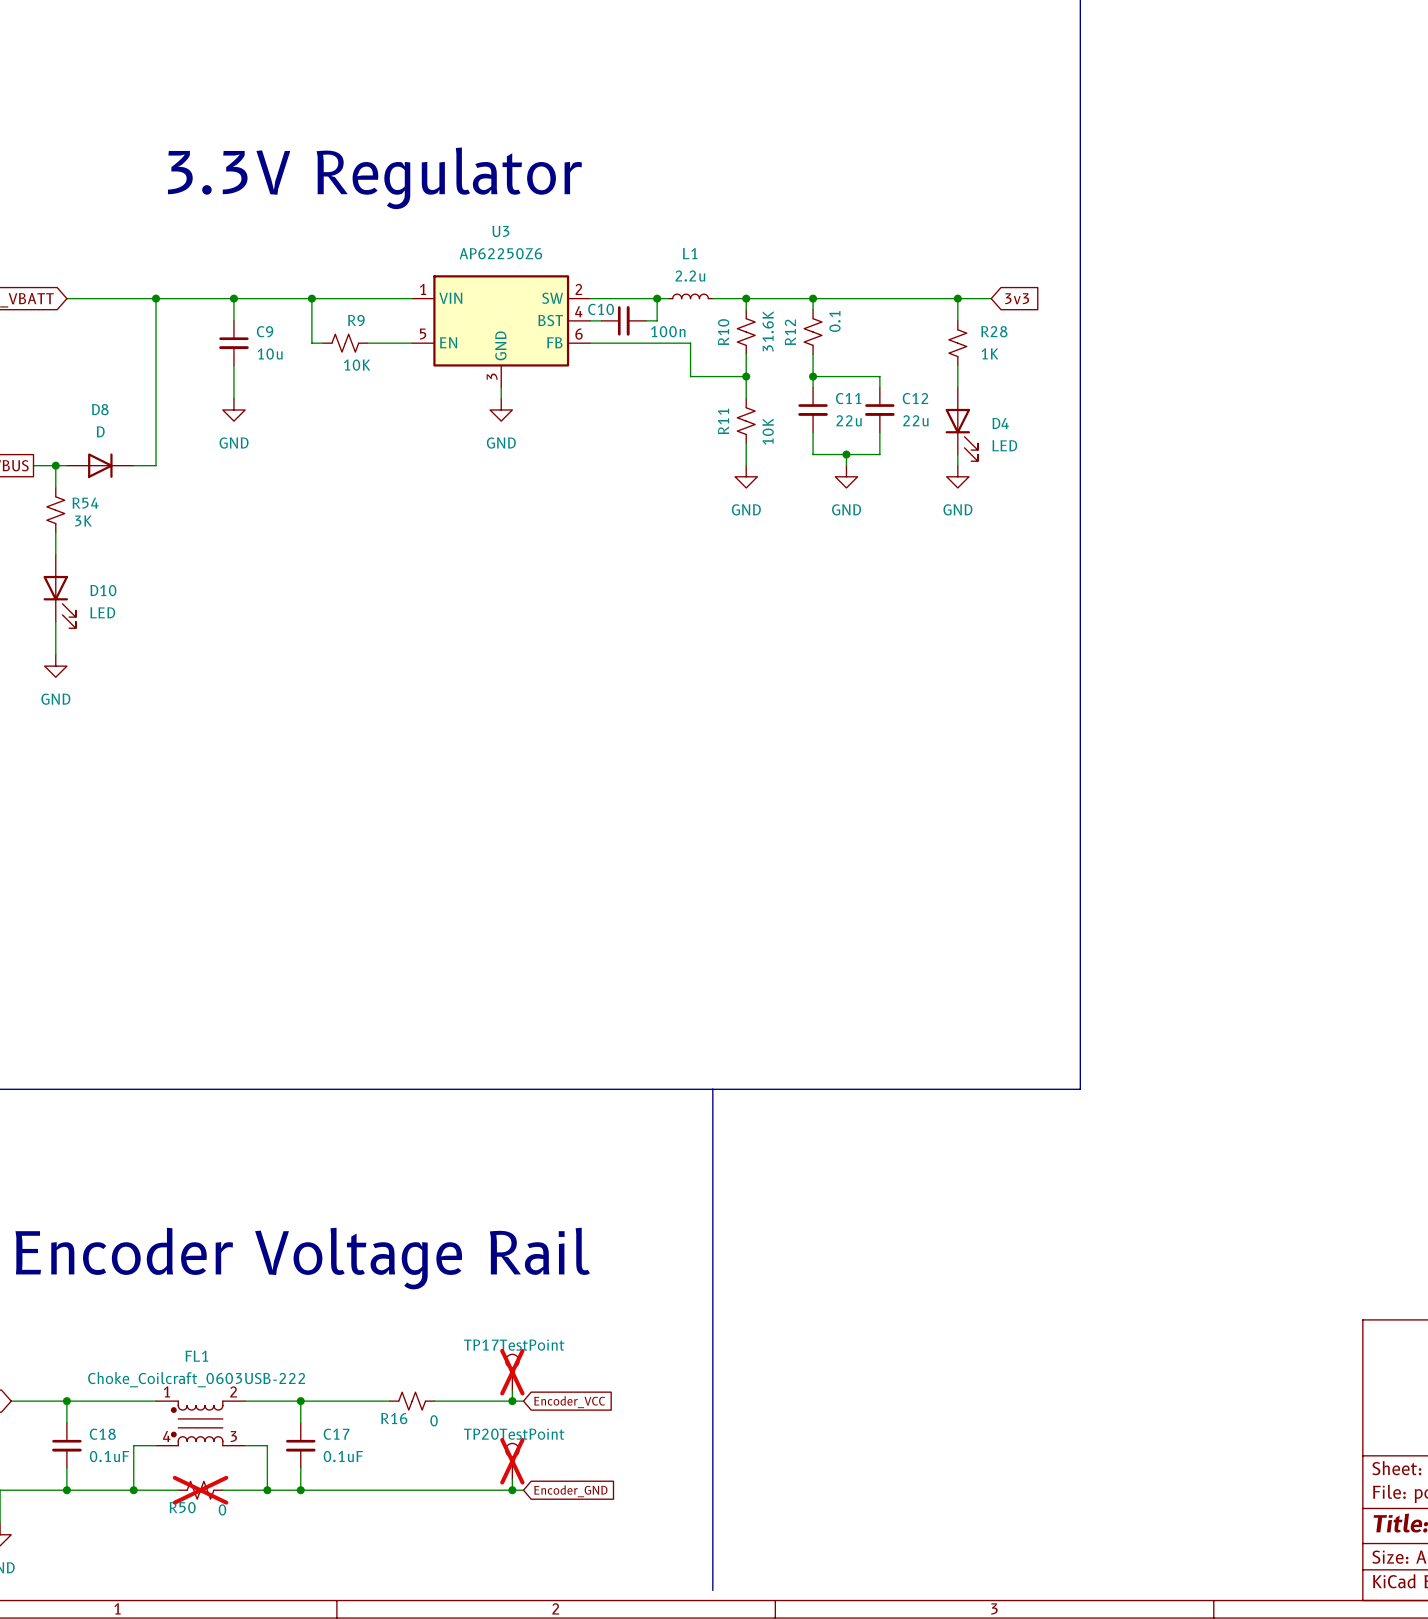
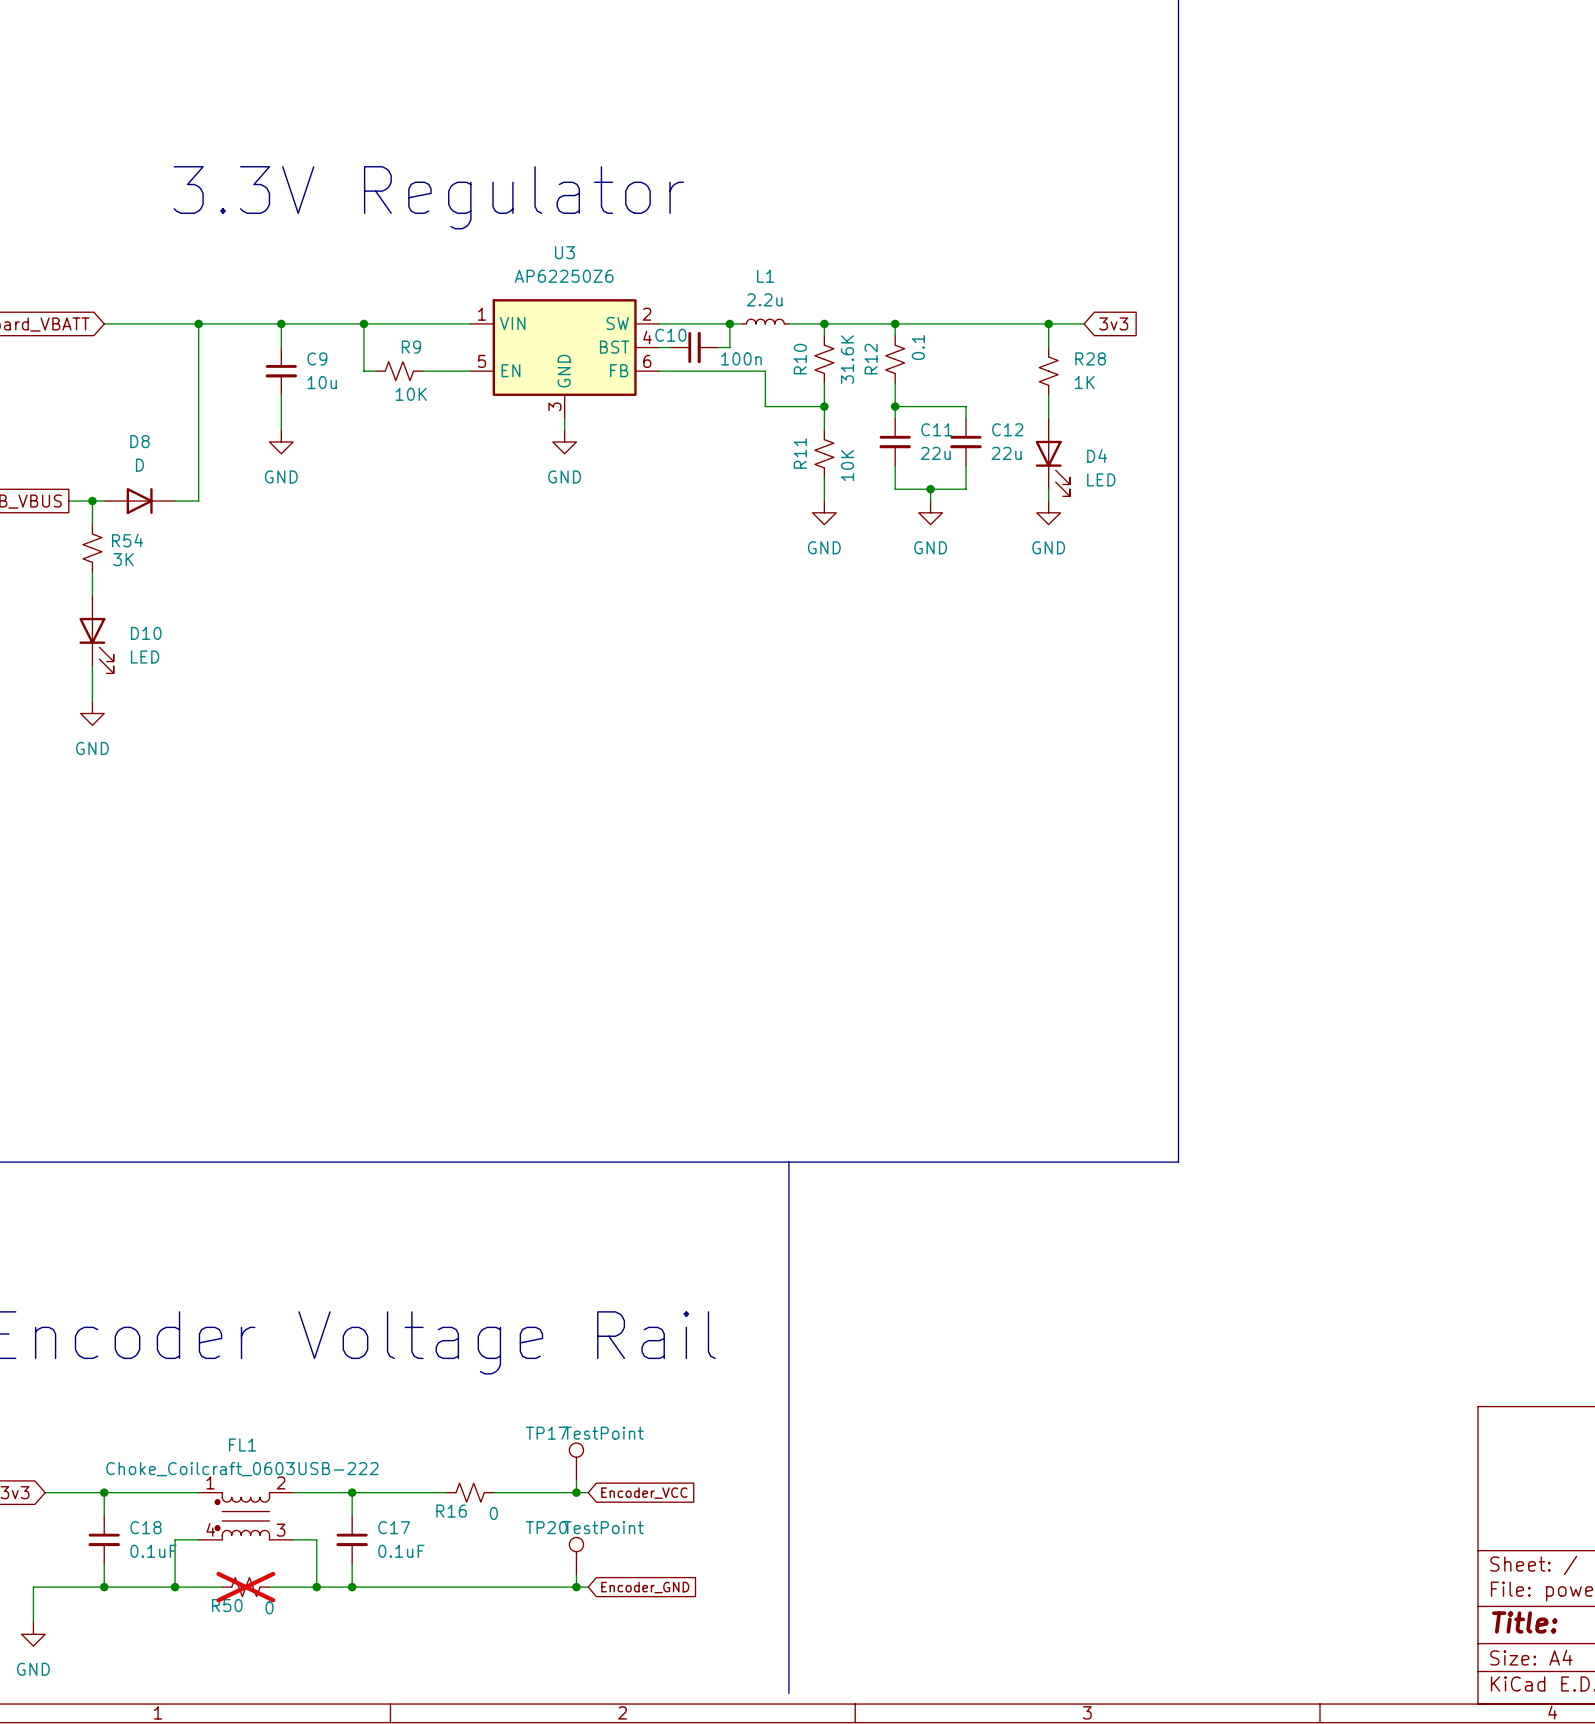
TP17 do-not-place cross: (512, 1372) -> none
TP20 do-not-place cross: (512, 1461) -> none

